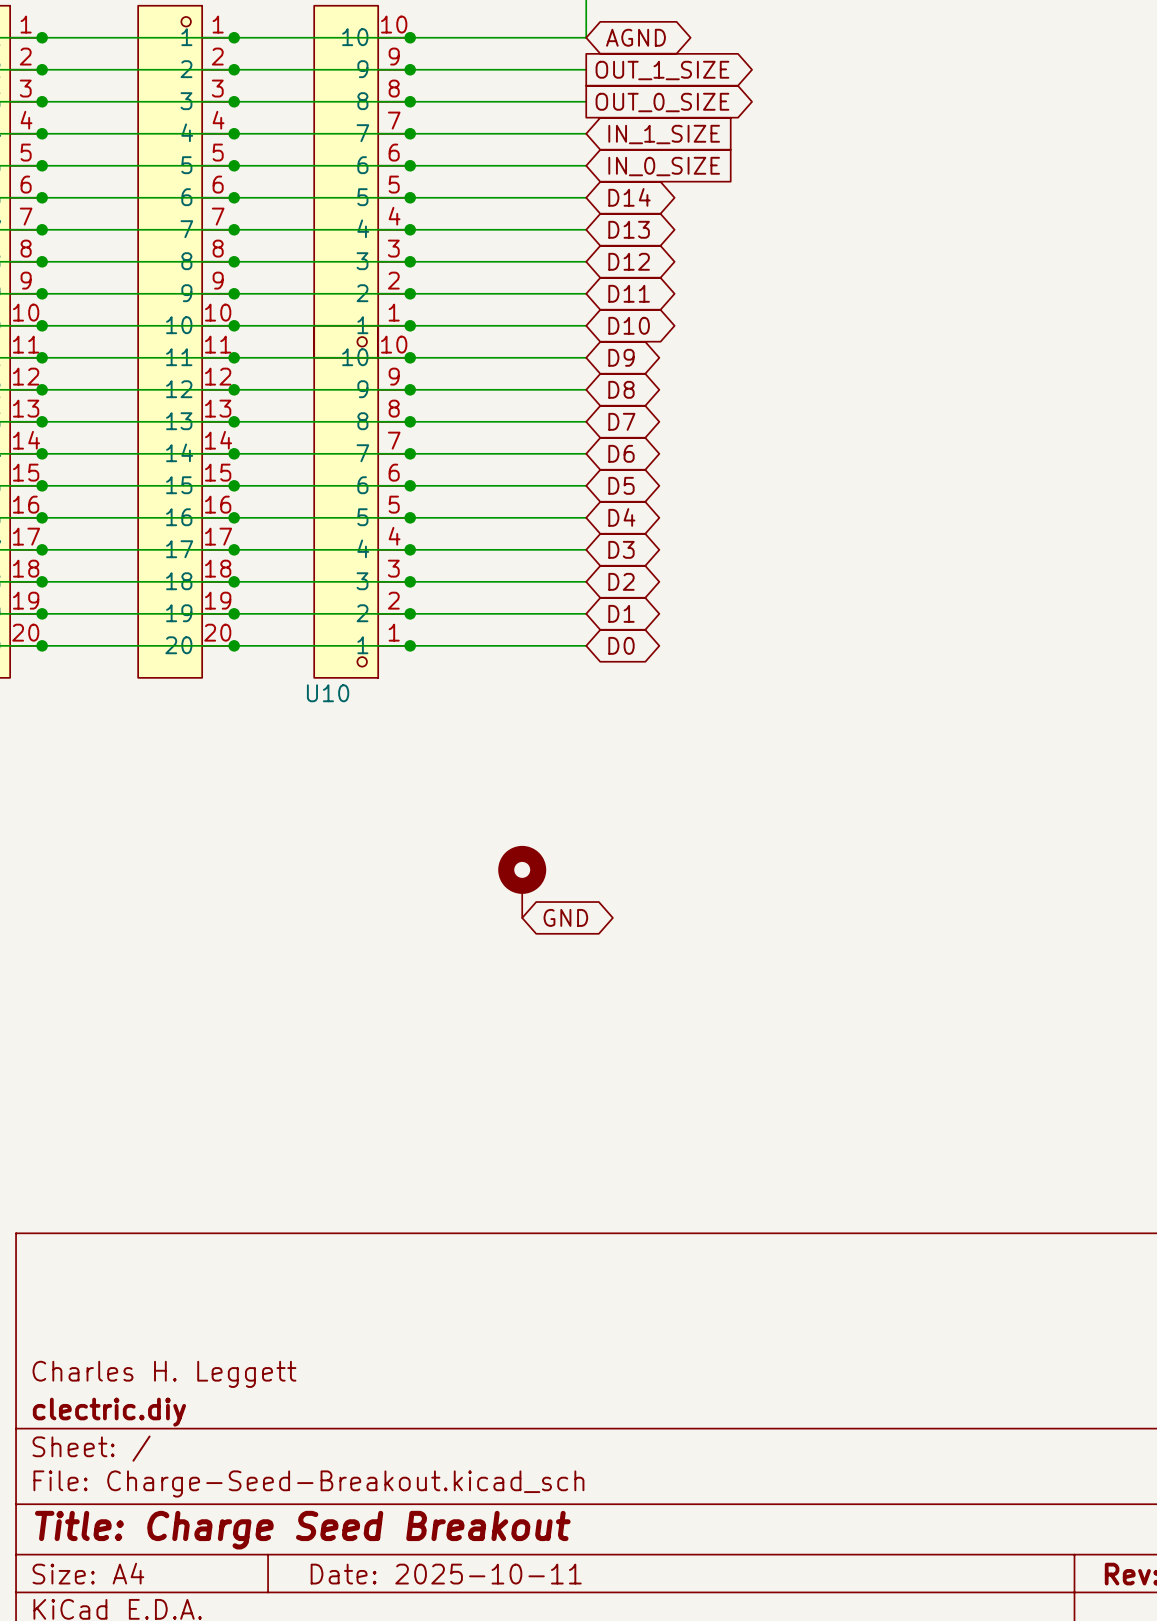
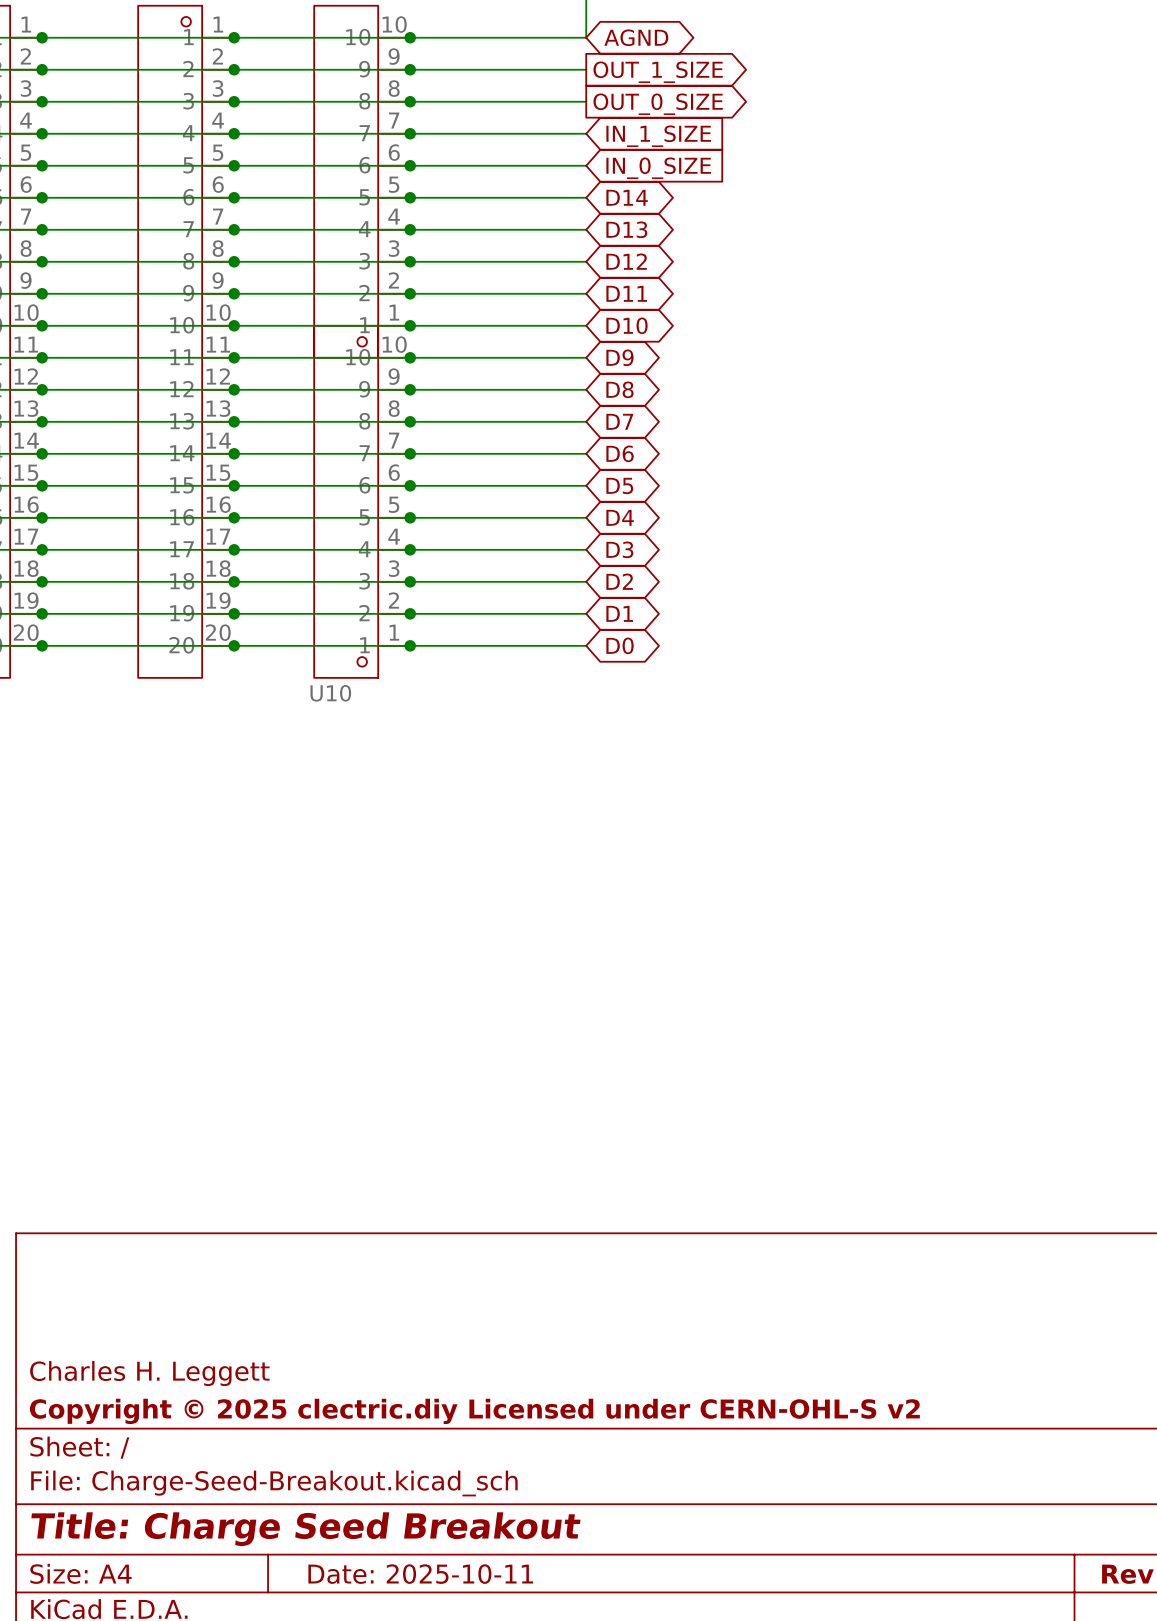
part: (522, 881) -> none
global label: GND (565, 917) -> none
title block: clectric.diy (109, 1412) -> Copyright © 2025 clectric.diy Licensed under CERN-OHL-S v2 (474, 1411)

